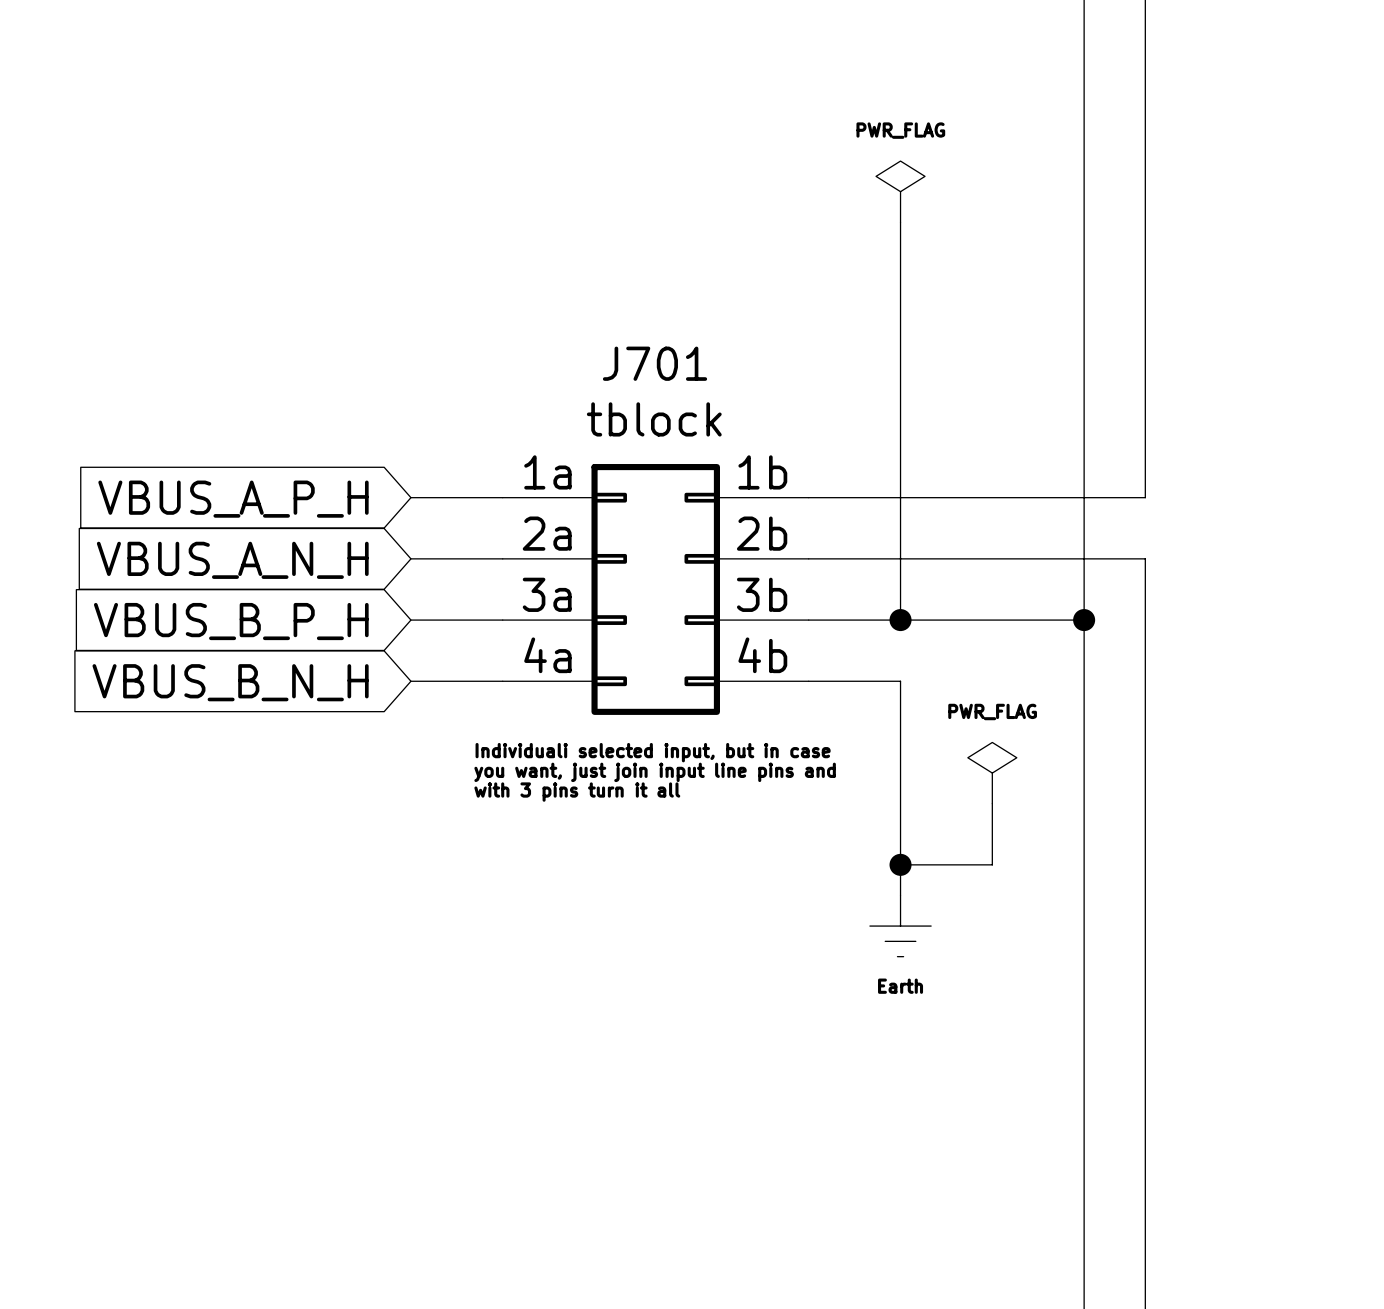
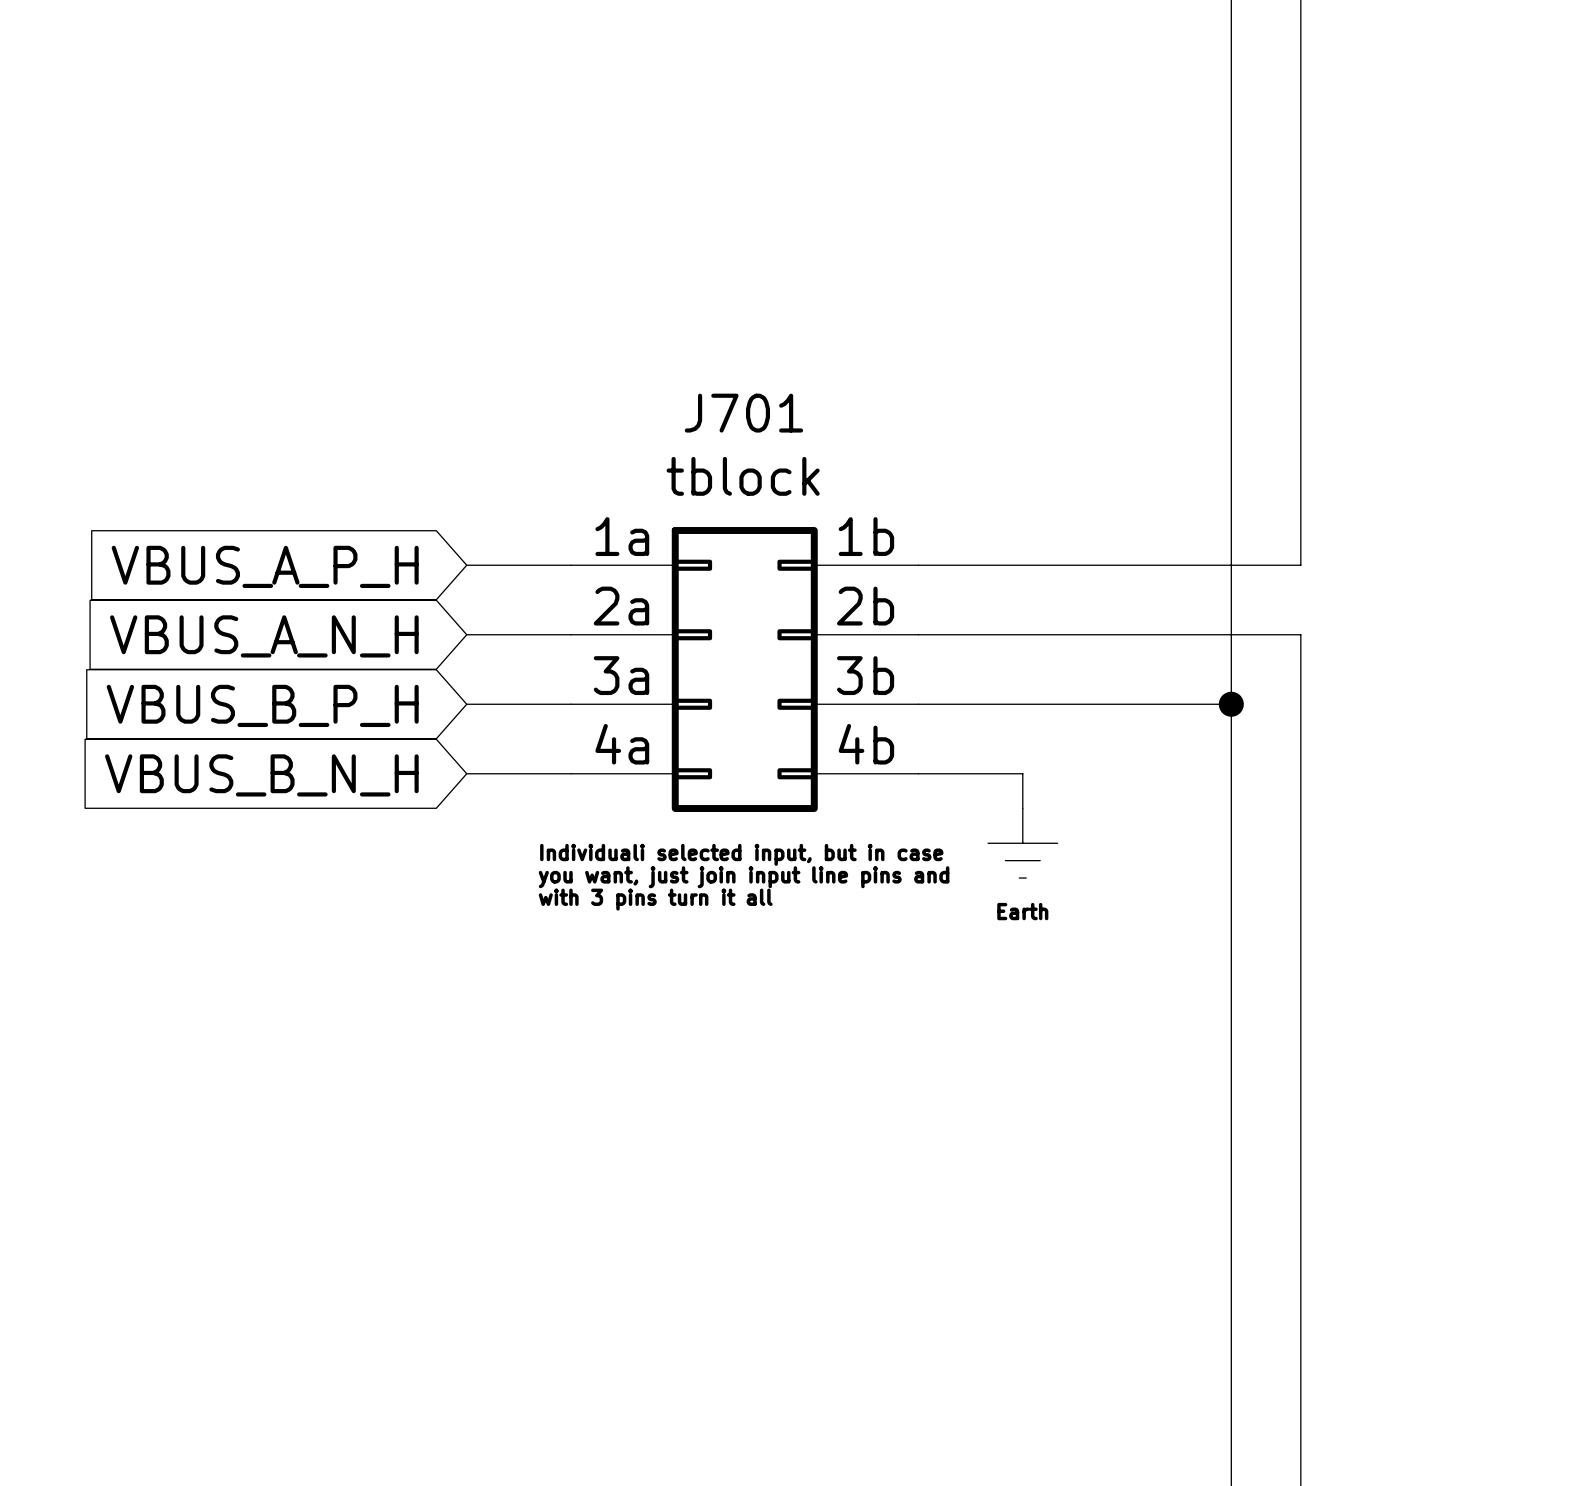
power symbol: PWR_FLAG (900, 191) -> none
wire: (900, 222) (900, 620) -> none
junction: (900, 620) -> none
wire: (900, 711) (900, 895) -> none
power symbol: PWR_FLAG (992, 773) -> none
wire: (992, 803) (992, 864) (900, 864) -> none
junction: (900, 864) -> none
power symbol position: Earth (900, 926) -> Earth (1022, 843)

